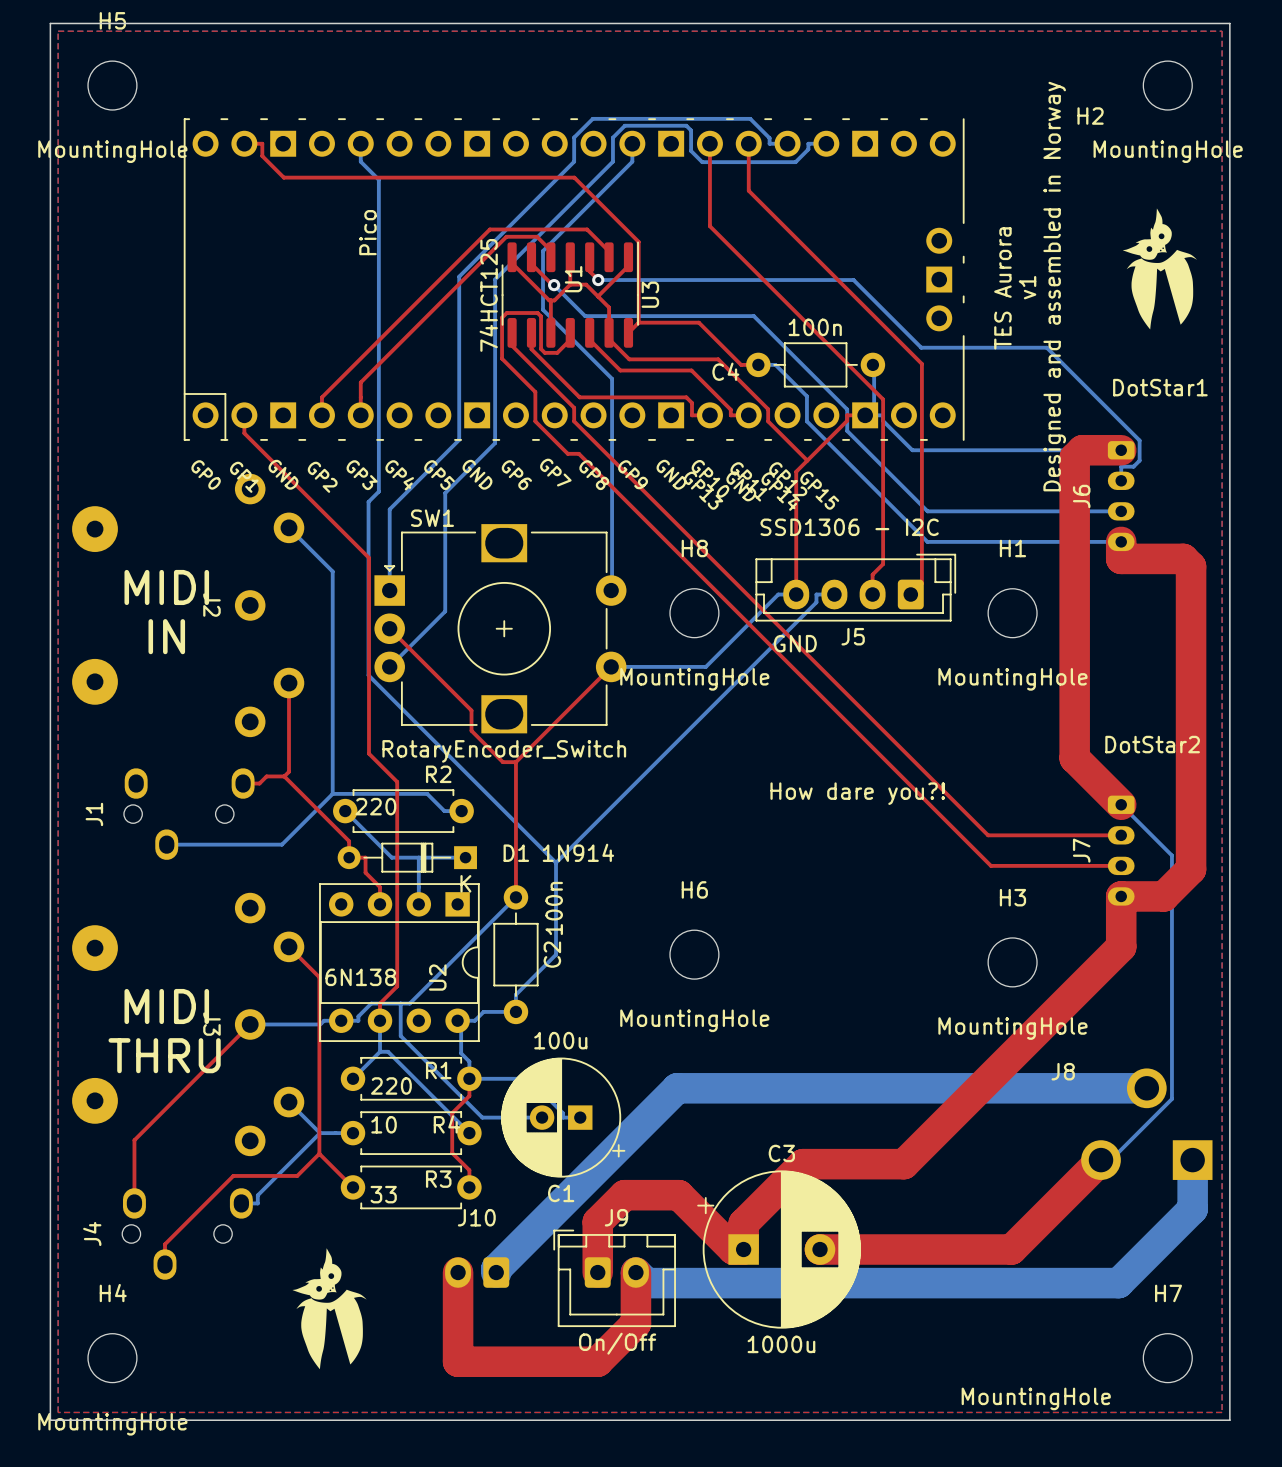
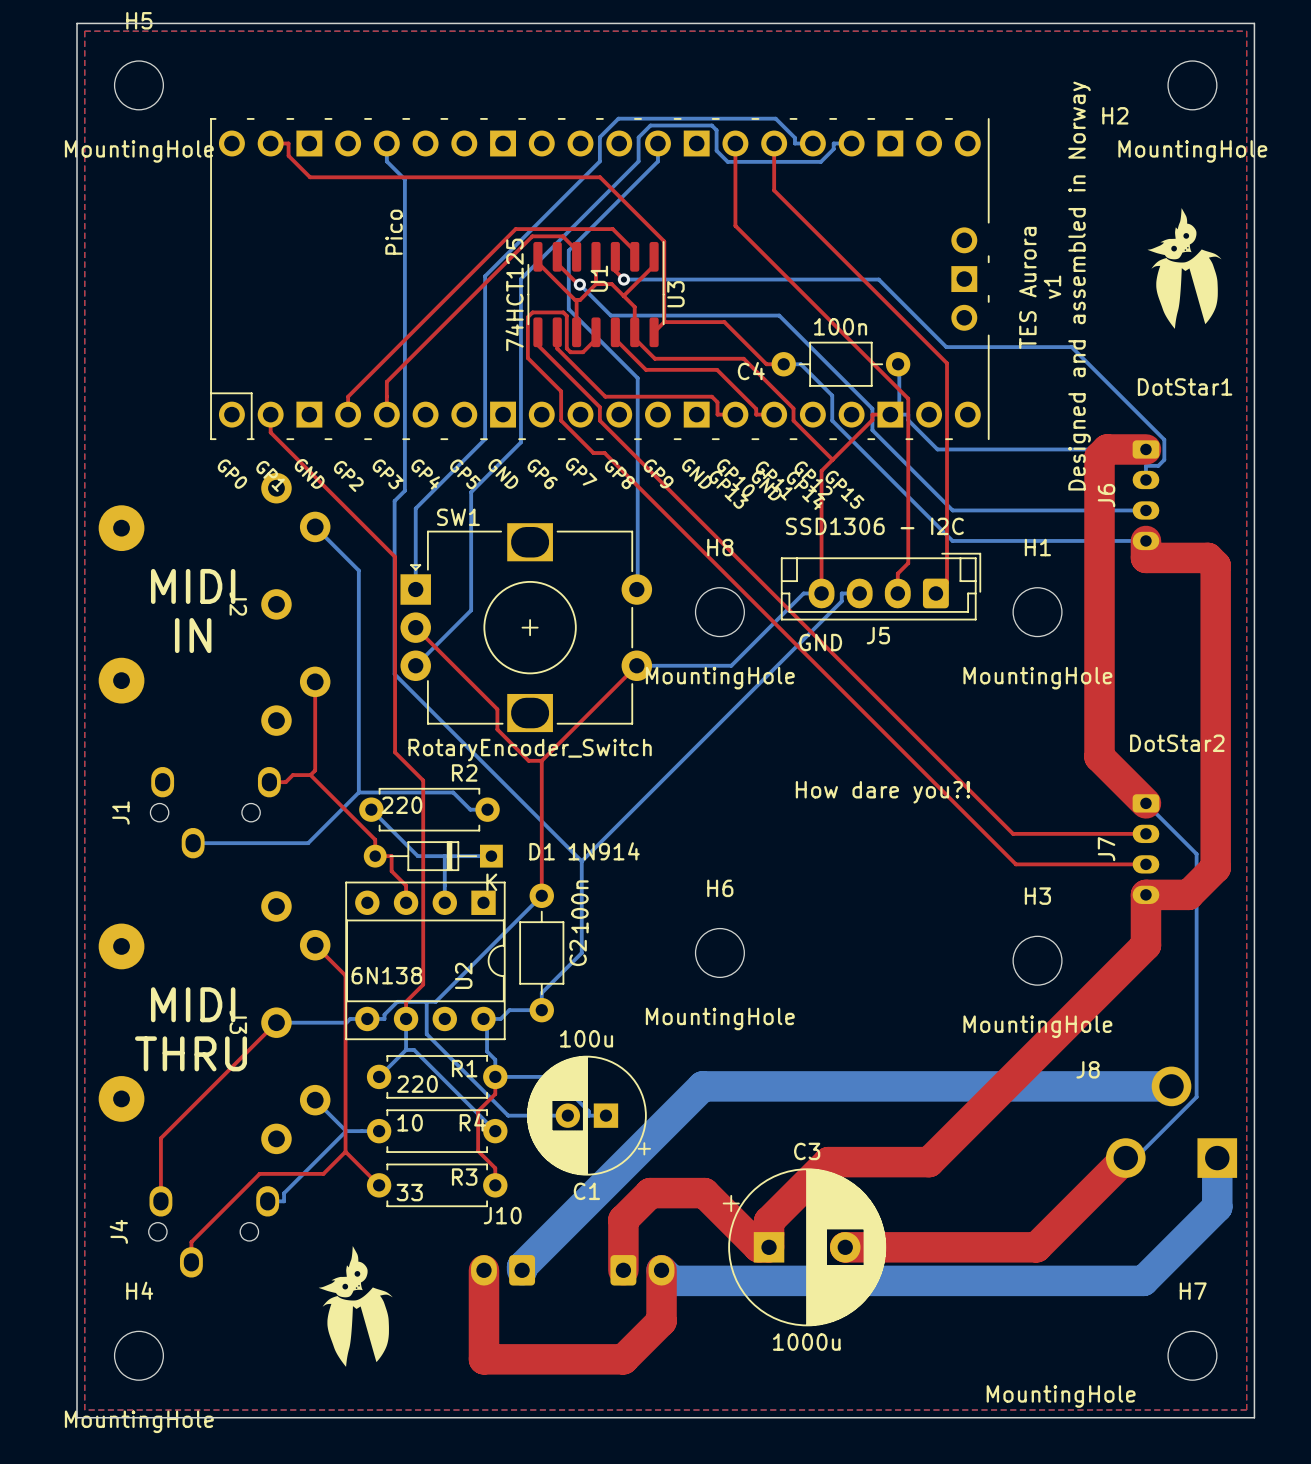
J9 side: top (614, 1278) -> bottom (642, 1270)

